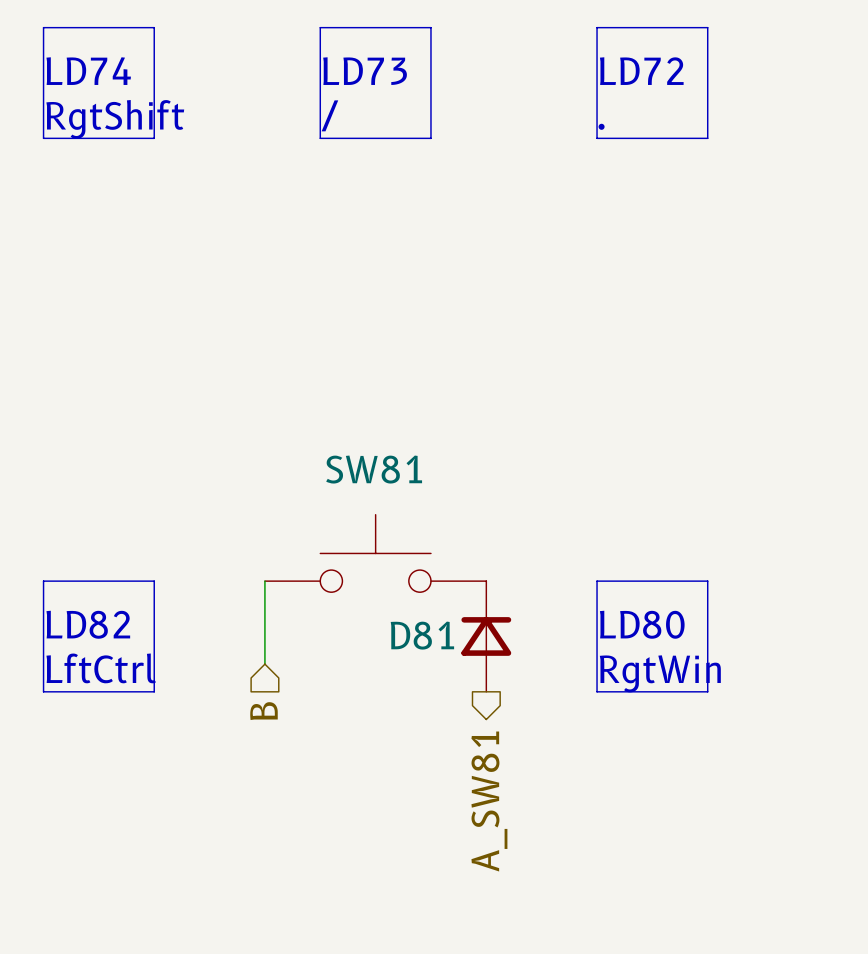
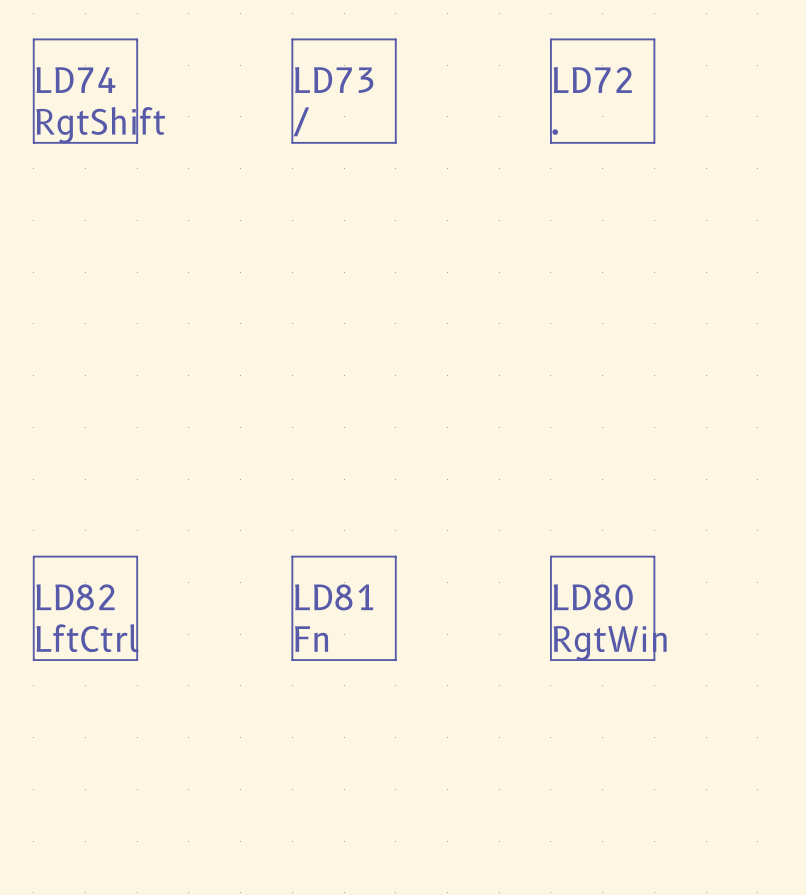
SW81: (375, 553) -> none
wire: (264, 581) (264, 664) -> none
line: none -> (292, 556) (395, 556) (395, 660) (292, 660) (292, 556)
text: none -> LD81 (334, 597)
D81: (486, 636) -> none
text: none -> Fn (311, 639)
hierarchical label: B (263, 711) -> none
hierarchical label: A_SW81 (489, 801) -> none

